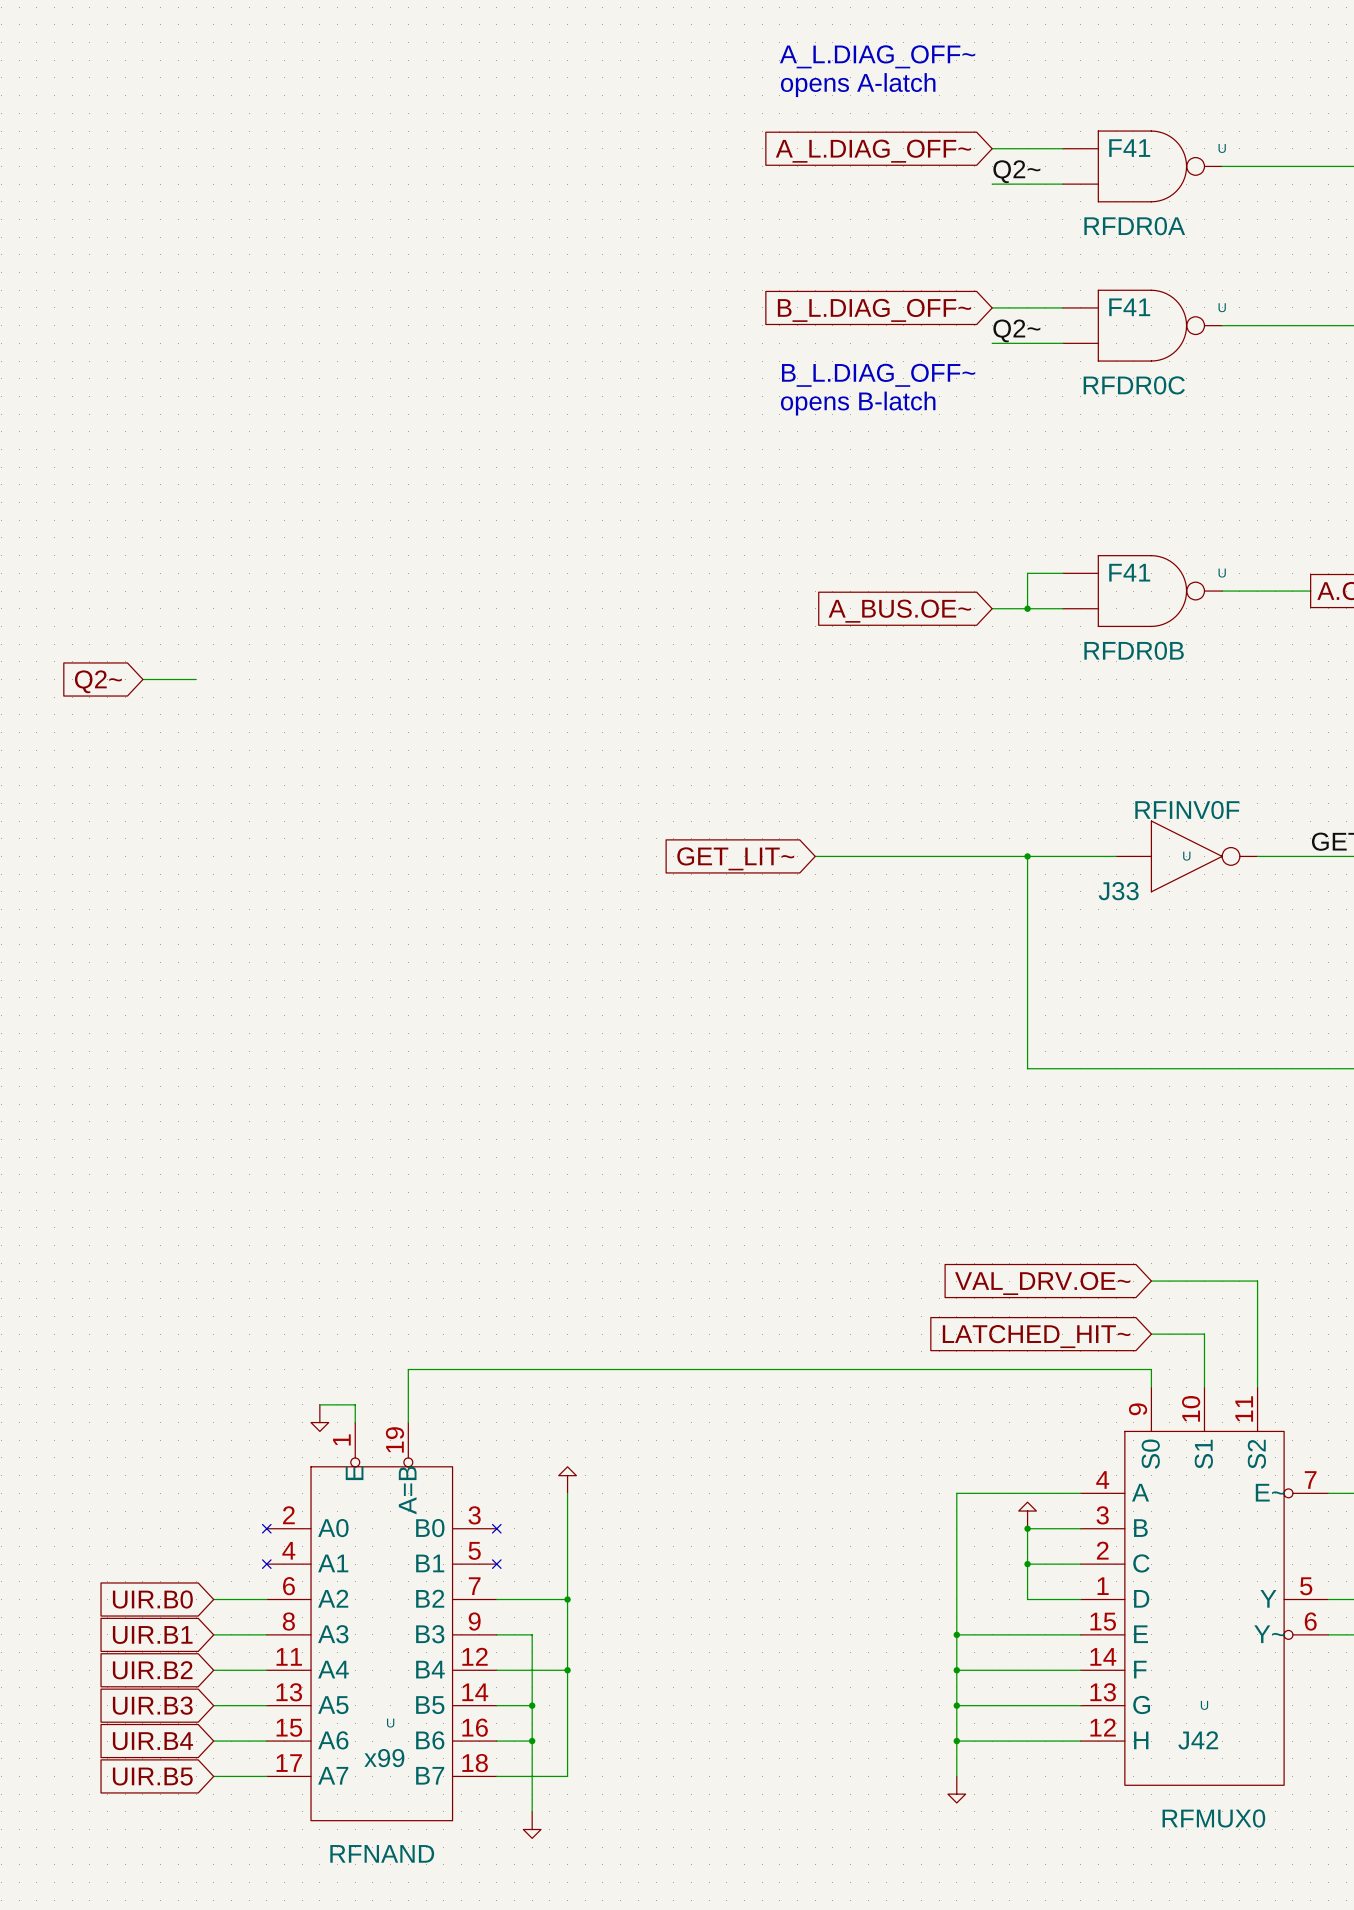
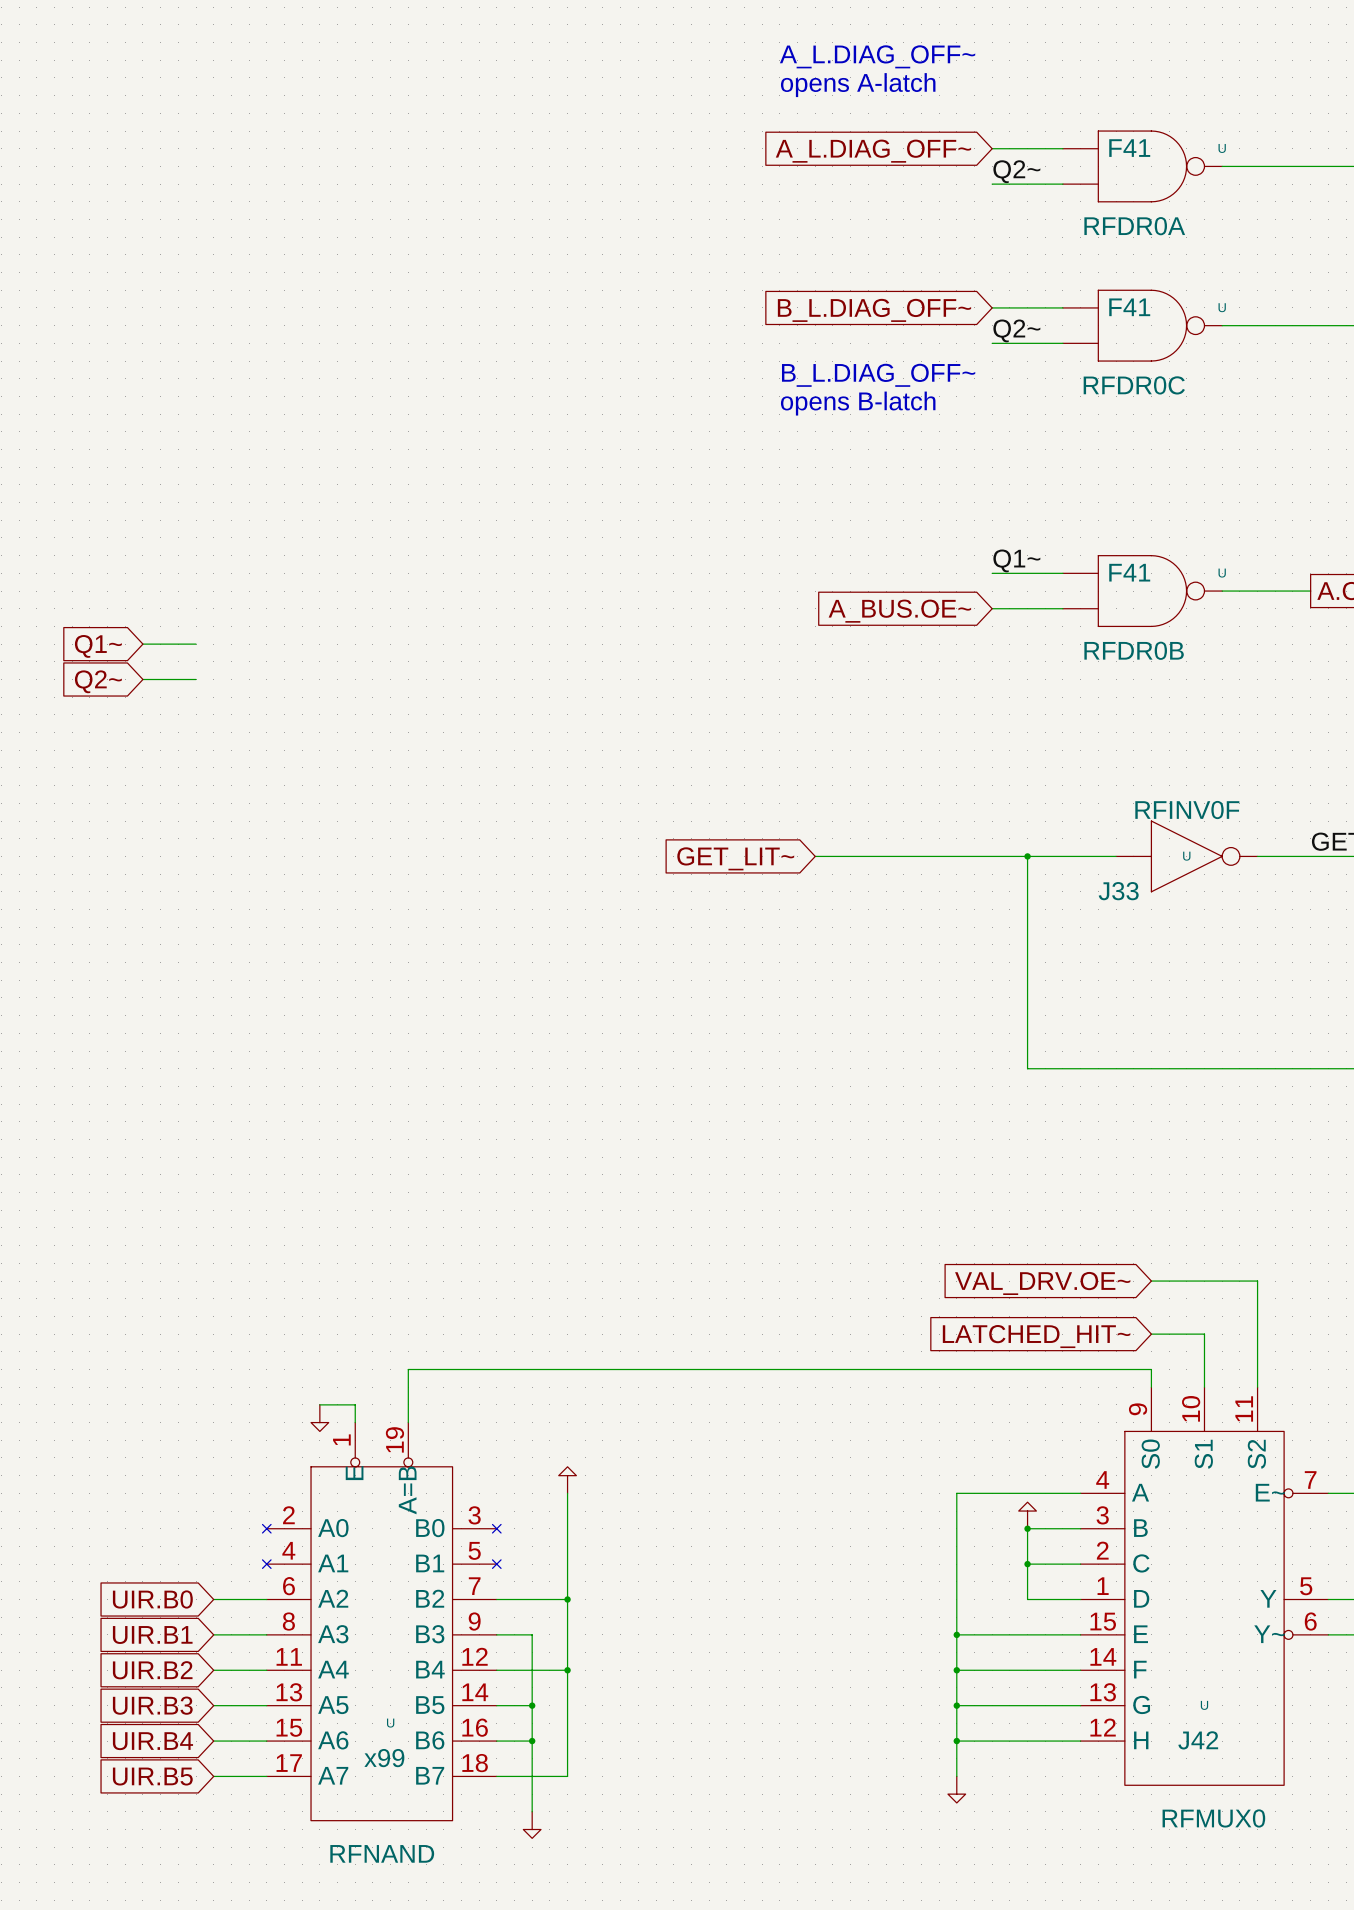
label: none -> Q1~ (1016, 560)
wire: (1027, 573) (1027, 608) -> (1027, 573) (992, 573)
junction: (1027, 608) -> none
wire: none -> (142, 644) (196, 644)
global label: none -> Q1~ (98, 646)

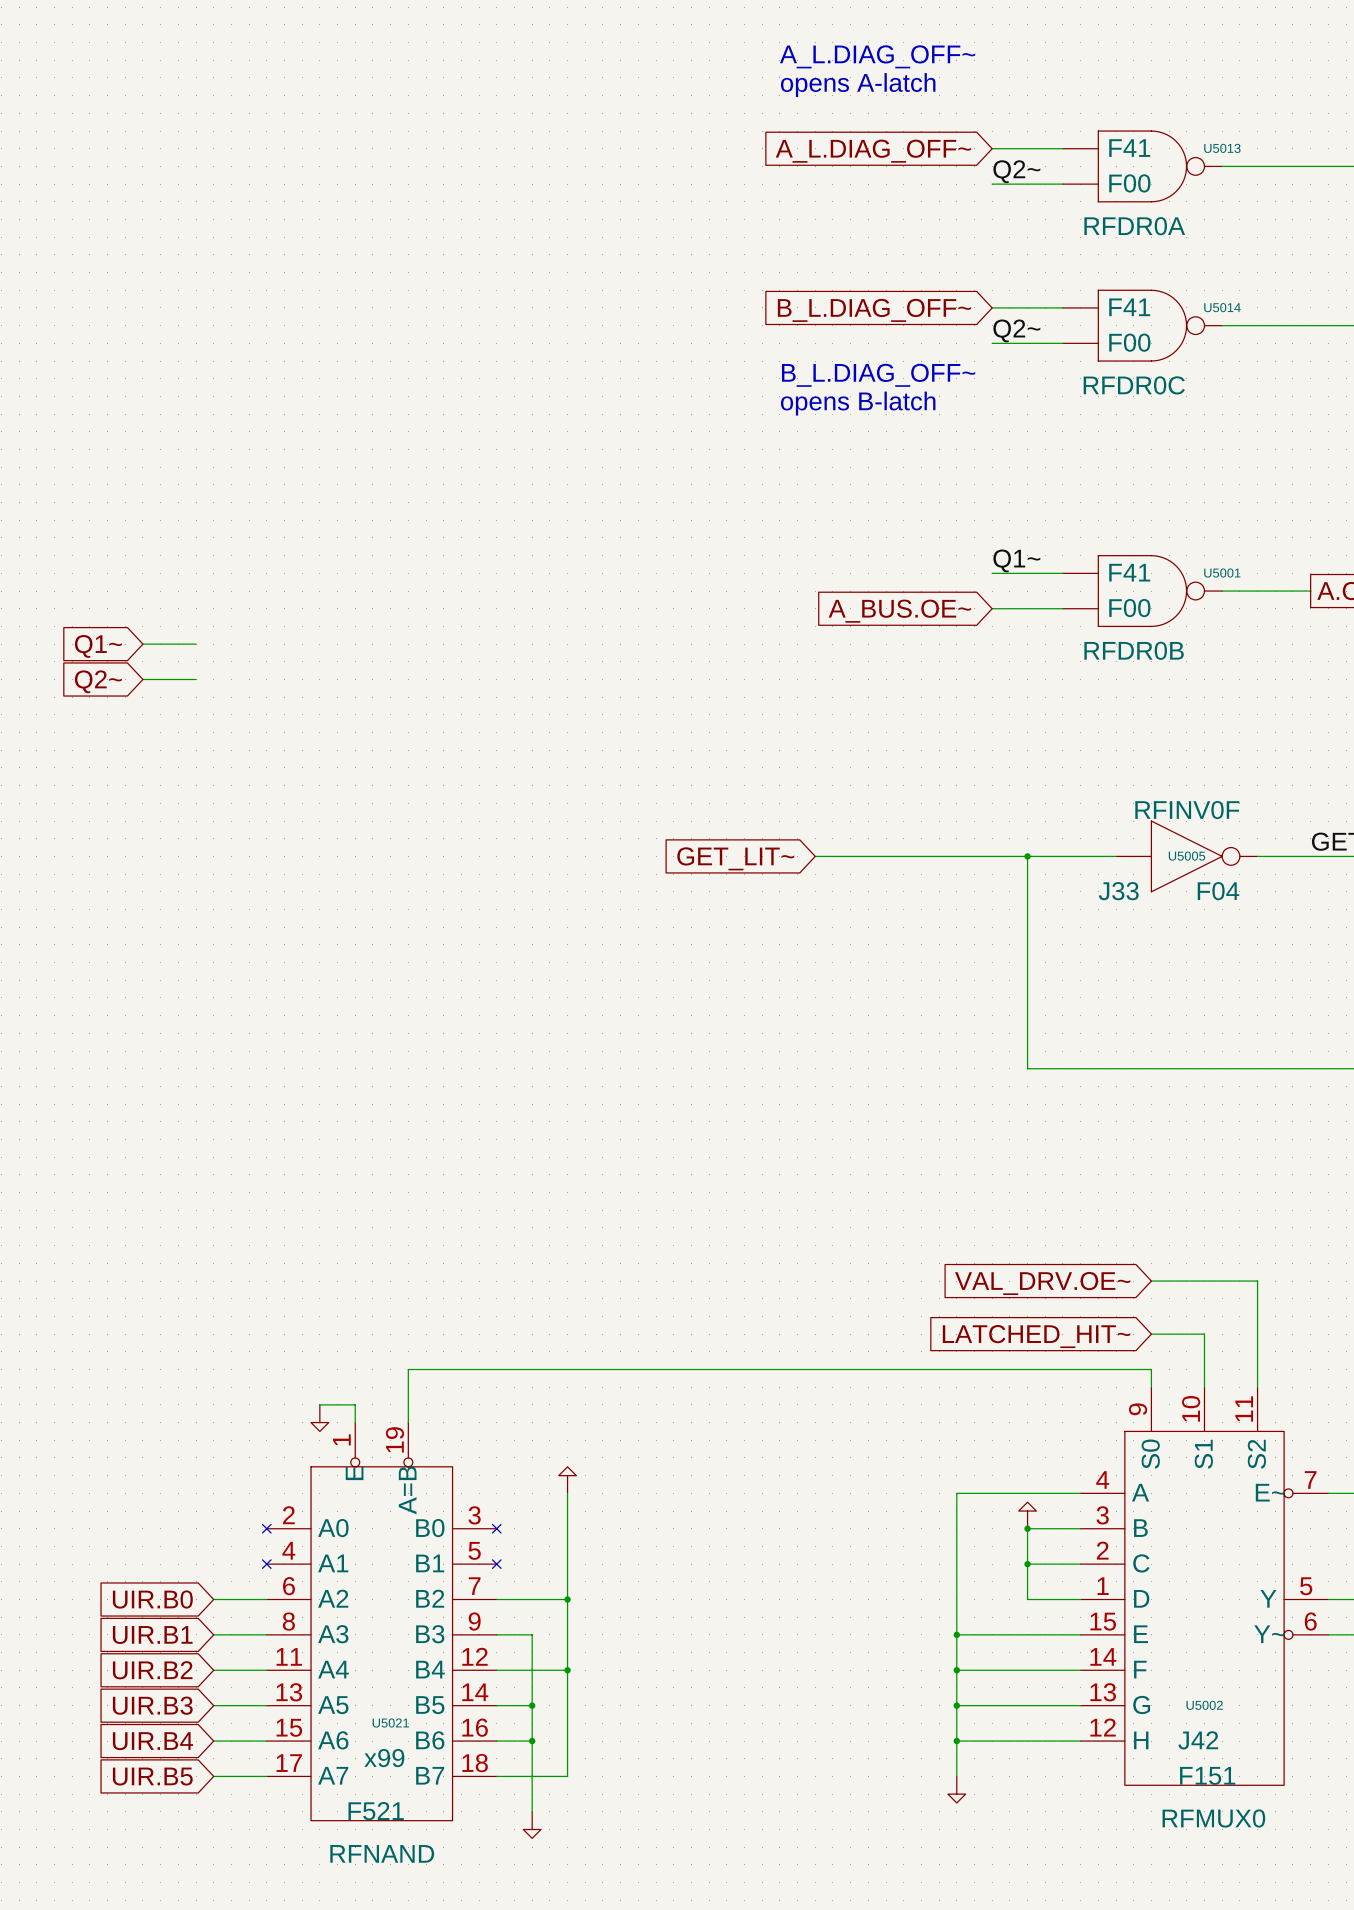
U name: U (1222, 148) -> U5013 (1222, 148)
U value: none -> F00 (1129, 183)
U name: U (1222, 307) -> U5014 (1222, 307)
U value: none -> F00 (1129, 342)
U name: U (1222, 573) -> U5001 (1222, 573)
U value: none -> F00 (1129, 608)
U name: U (1186, 856) -> U5005 (1187, 856)
U value: none -> F04 (1218, 891)
U name: U (1204, 1705) -> U5002 (1204, 1705)
U name: U (390, 1723) -> U5021 (390, 1723)
U value: none -> F151 (1207, 1775)
U value: none -> F521 (376, 1811)

